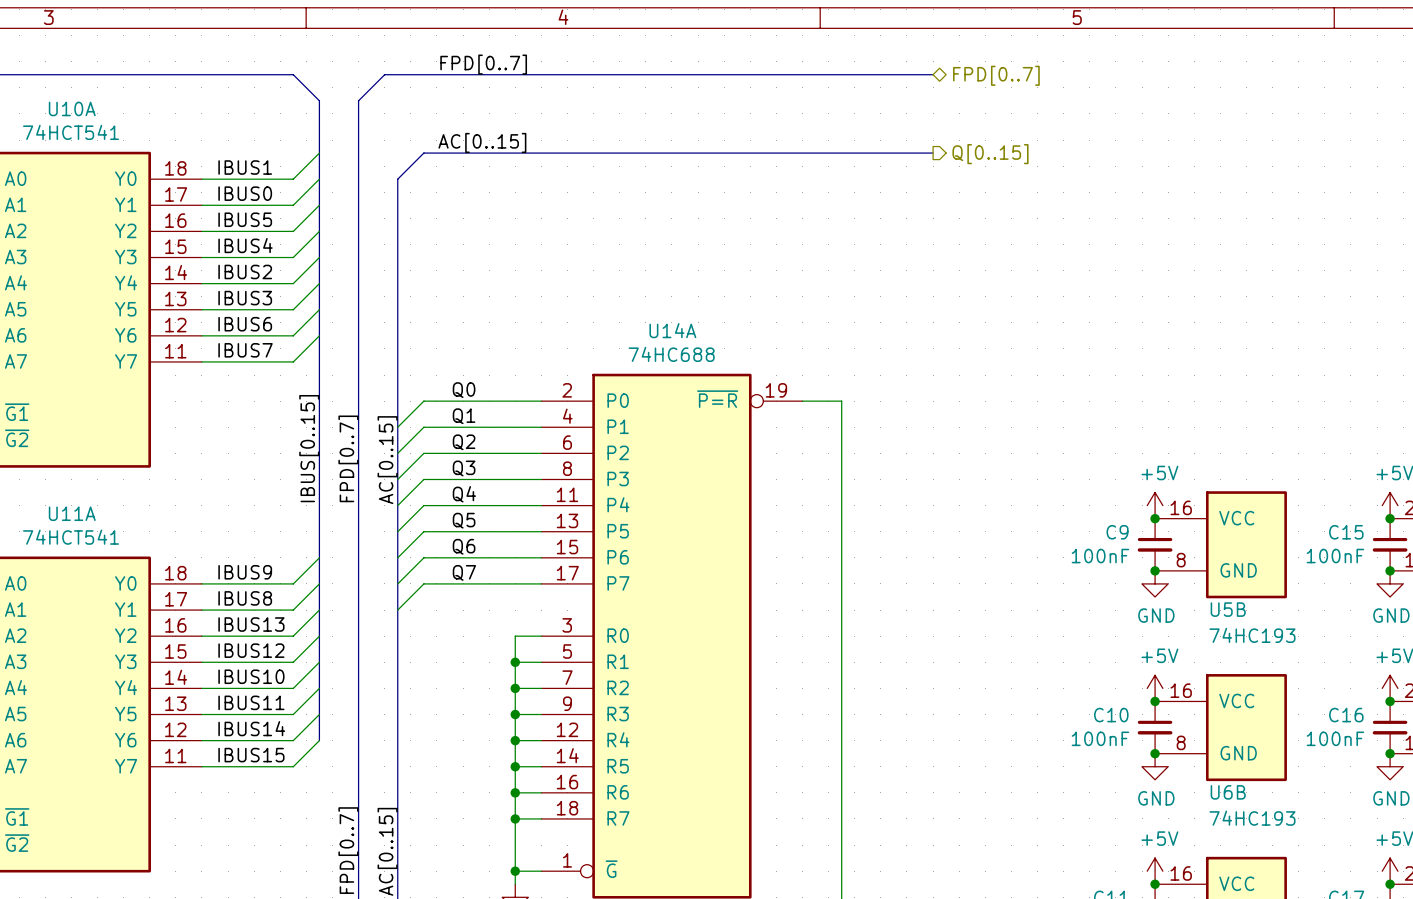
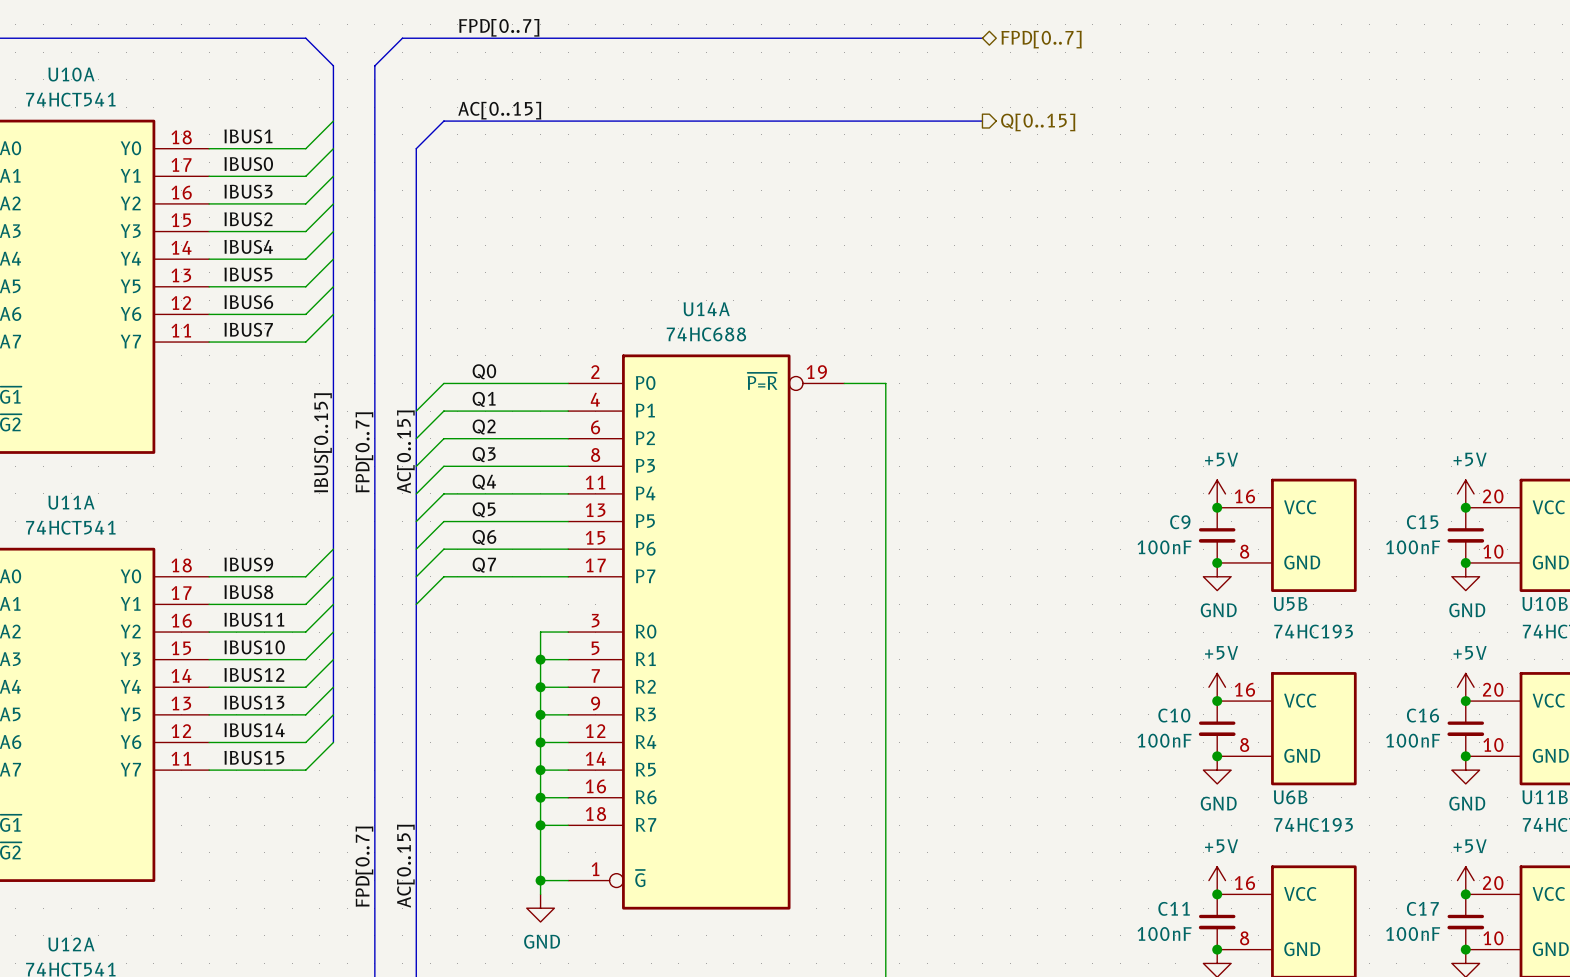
label: IBUS5 (245, 219) -> IBUS3 (248, 191)
label: IBUS4 (245, 245) -> IBUS2 (248, 219)
label: IBUS2 (245, 271) -> IBUS4 (248, 246)
label: IBUS3 (245, 298) -> IBUS5 (248, 274)
label: IBUS13 (251, 624) -> IBUS11 (254, 619)
label: IBUS12 (251, 650) -> IBUS10 (254, 647)
label: IBUS10 (251, 676) -> IBUS12 (254, 675)
label: IBUS11 (251, 702) -> IBUS13 (254, 702)

